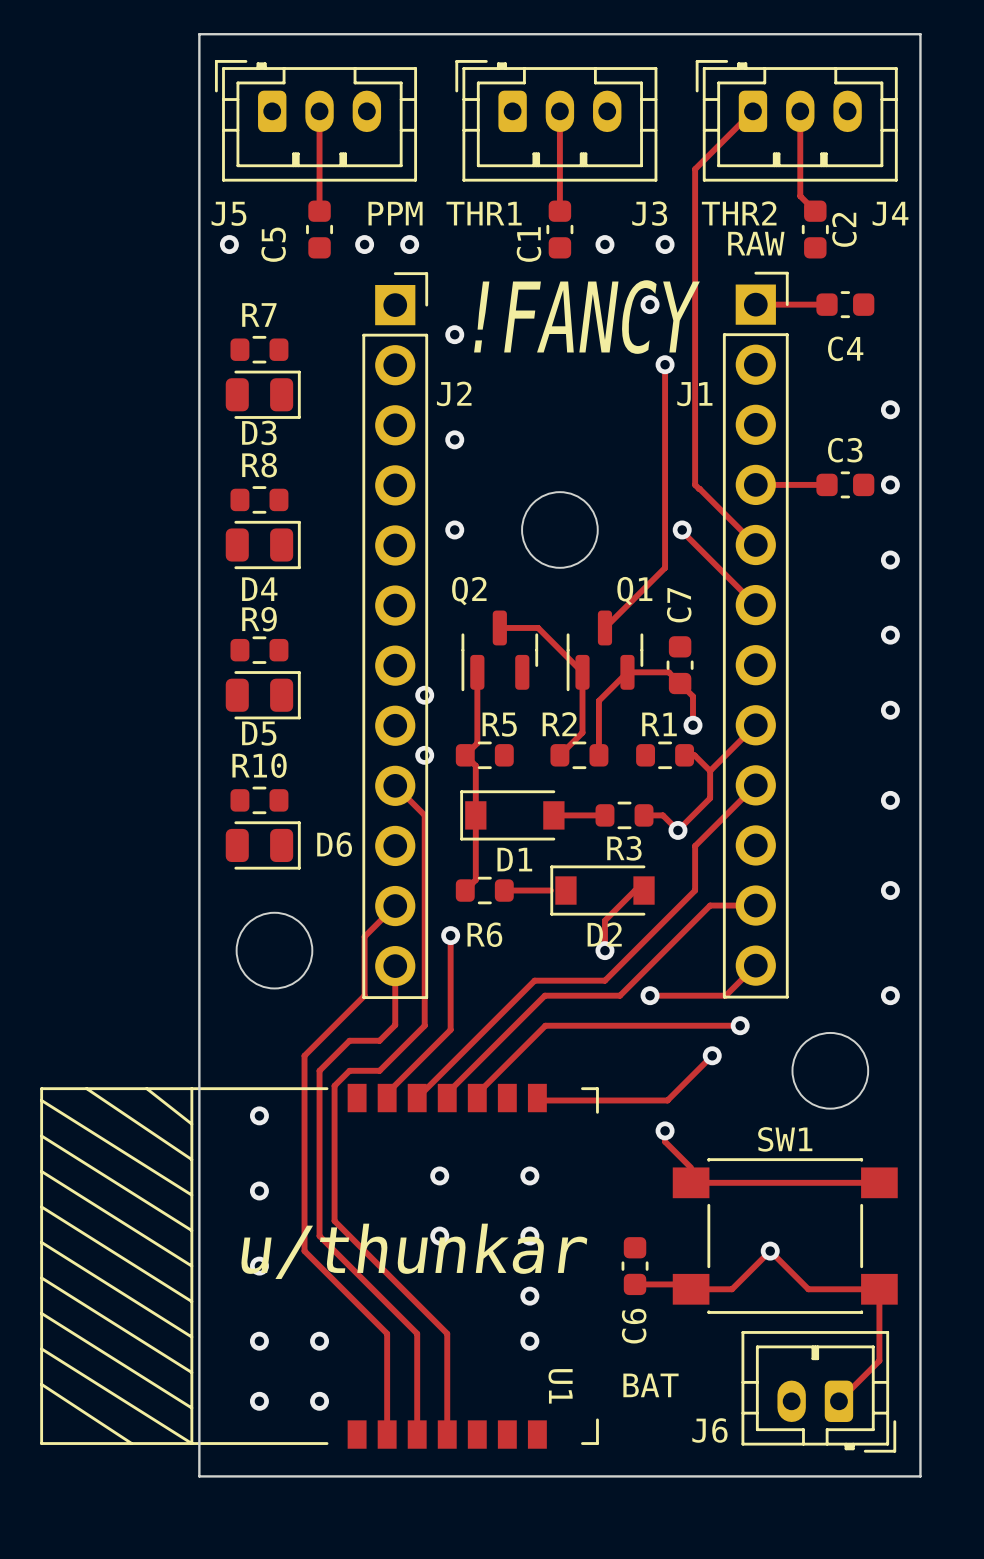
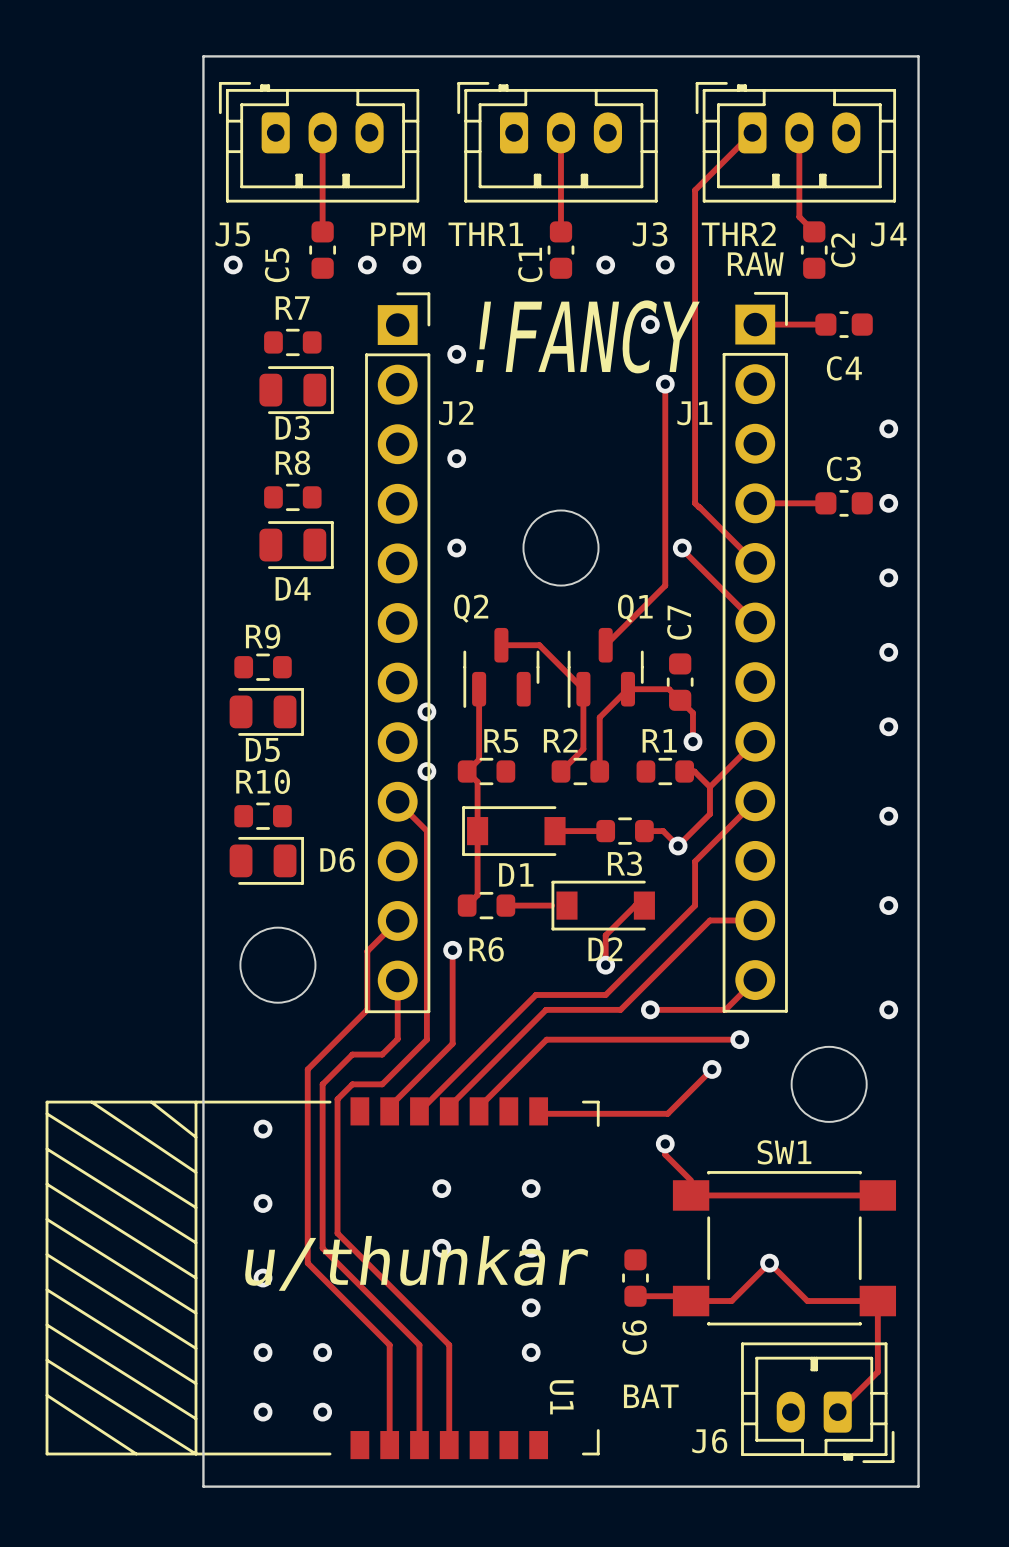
R7 position: (259, 349) -> (292, 342)
D3 position: (263, 394) -> (296, 390)
R8 position: (259, 499) -> (292, 497)
D4 position: (263, 545) -> (296, 545)

